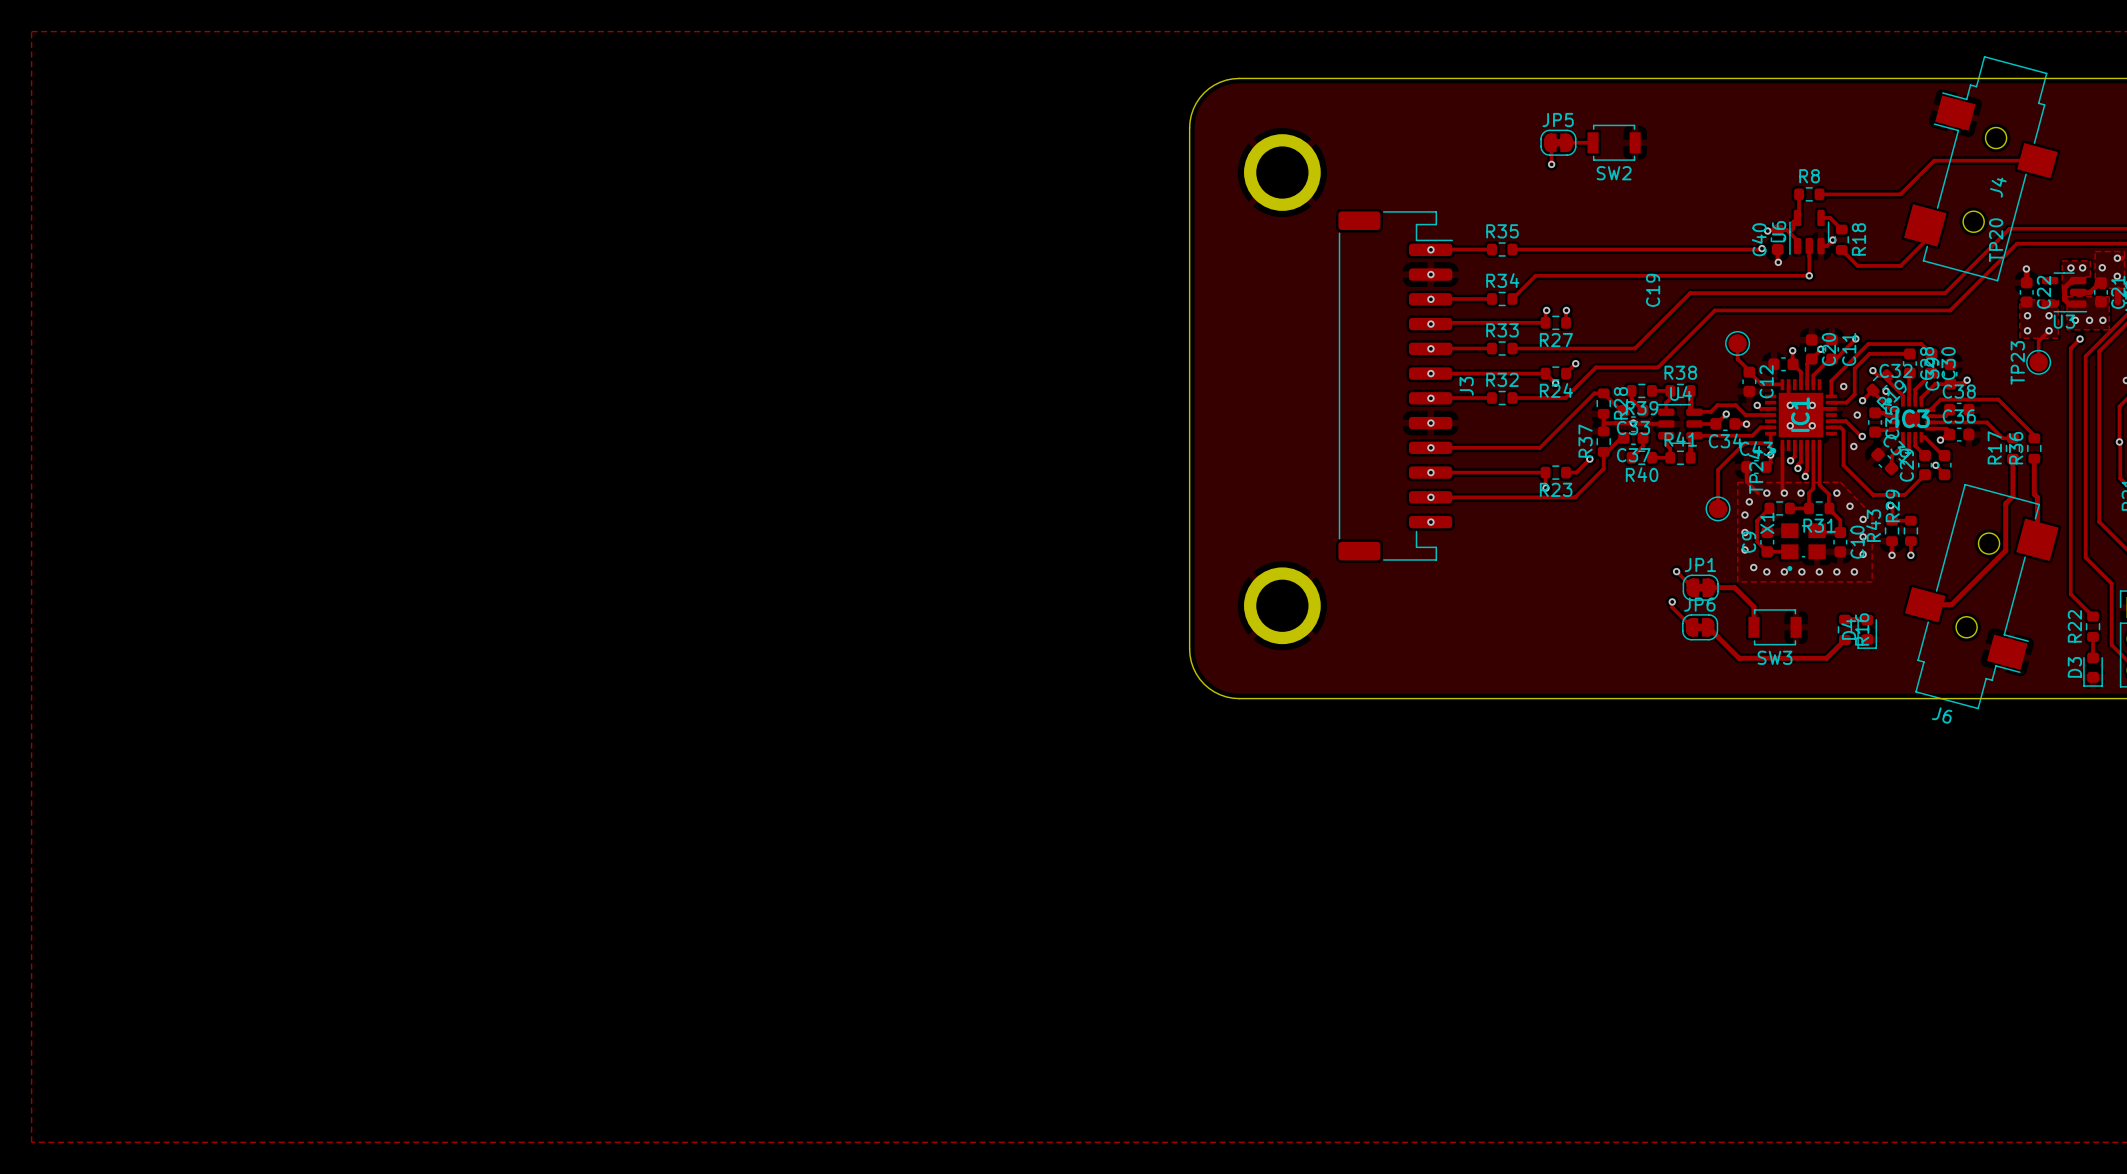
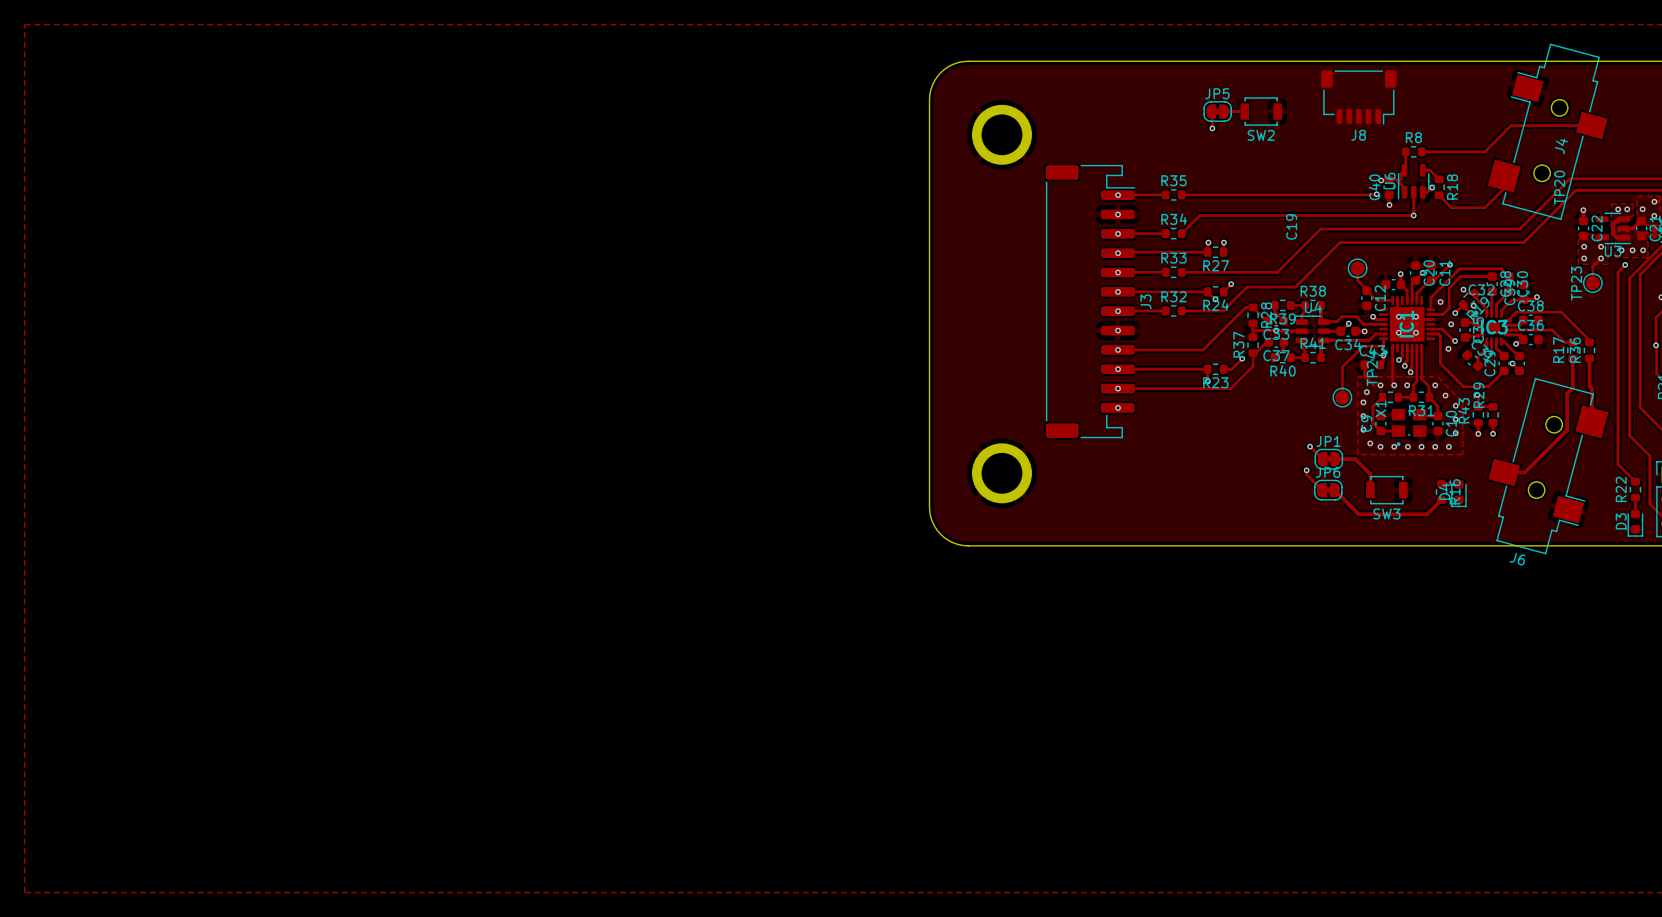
J8: none -> (1358, 97)

